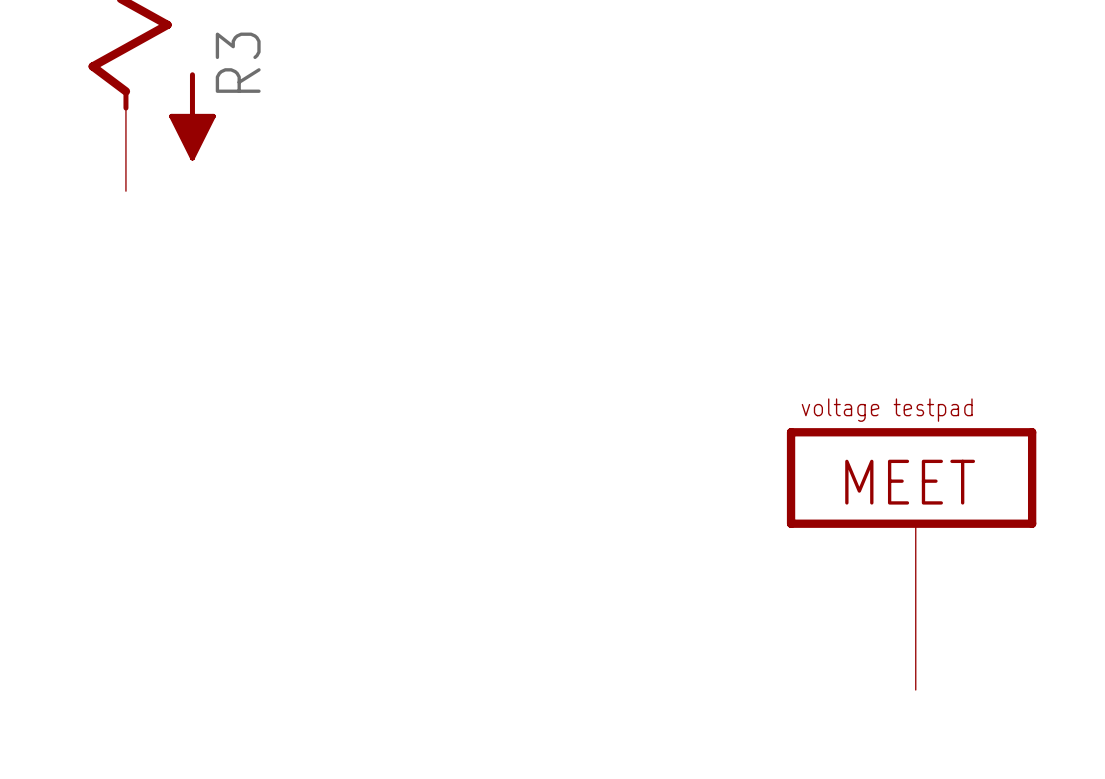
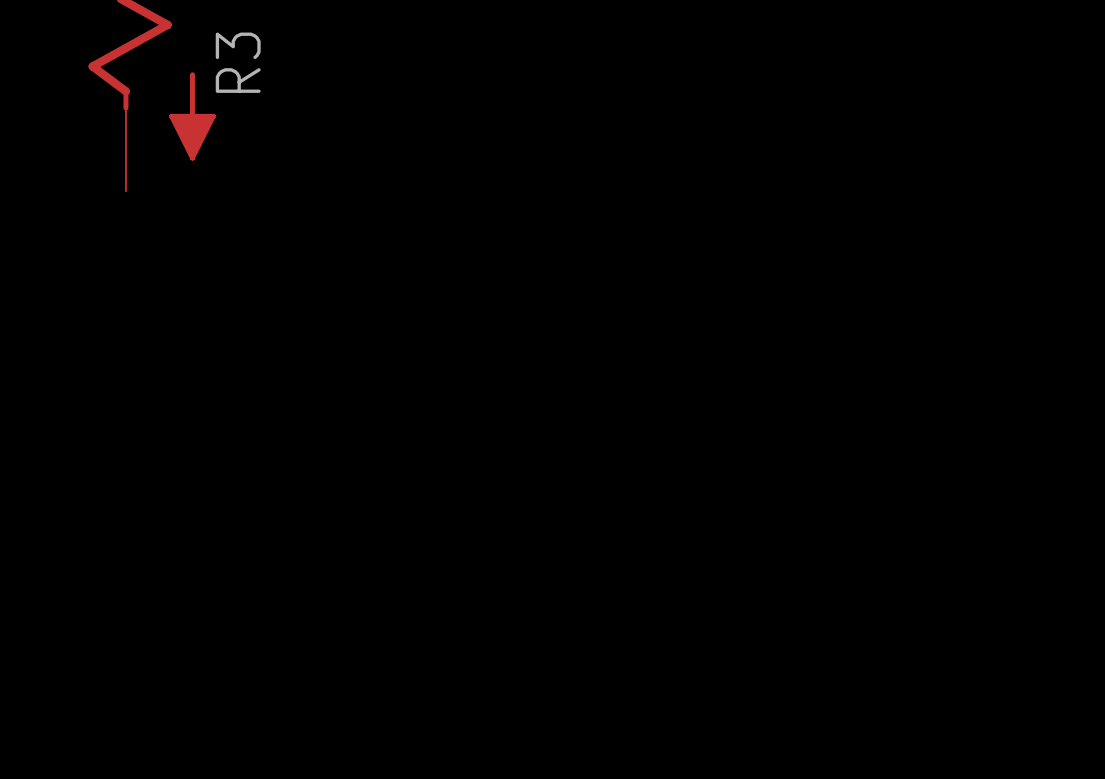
part: (911, 559) -> none

